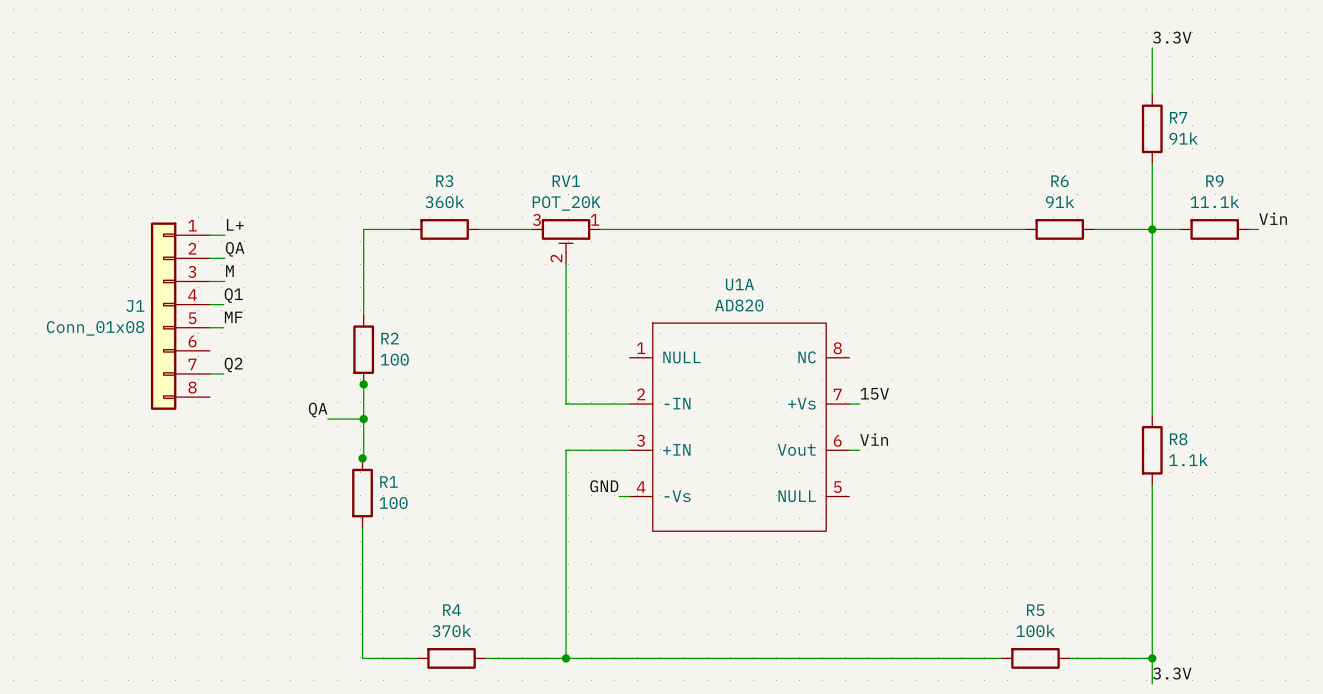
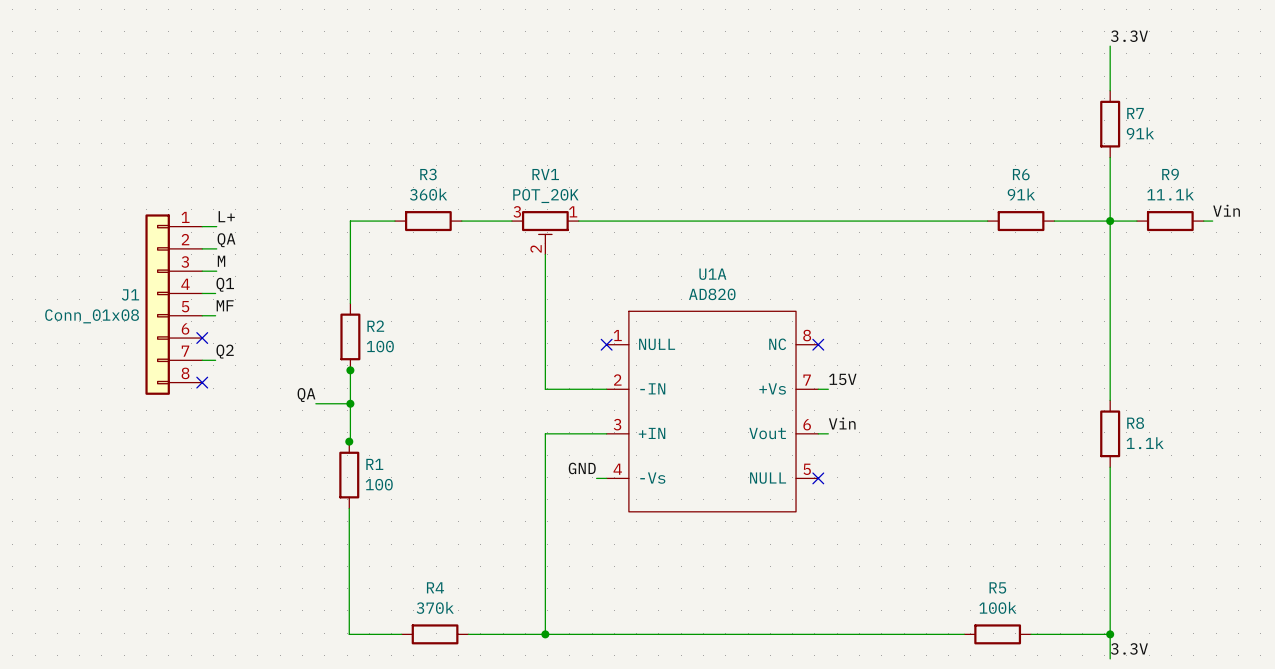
no-connect mark: none -> (202, 338)
no-connect mark: none -> (606, 344)
no-connect mark: none -> (818, 344)
no-connect mark: none -> (202, 382)
no-connect mark: none -> (818, 478)

